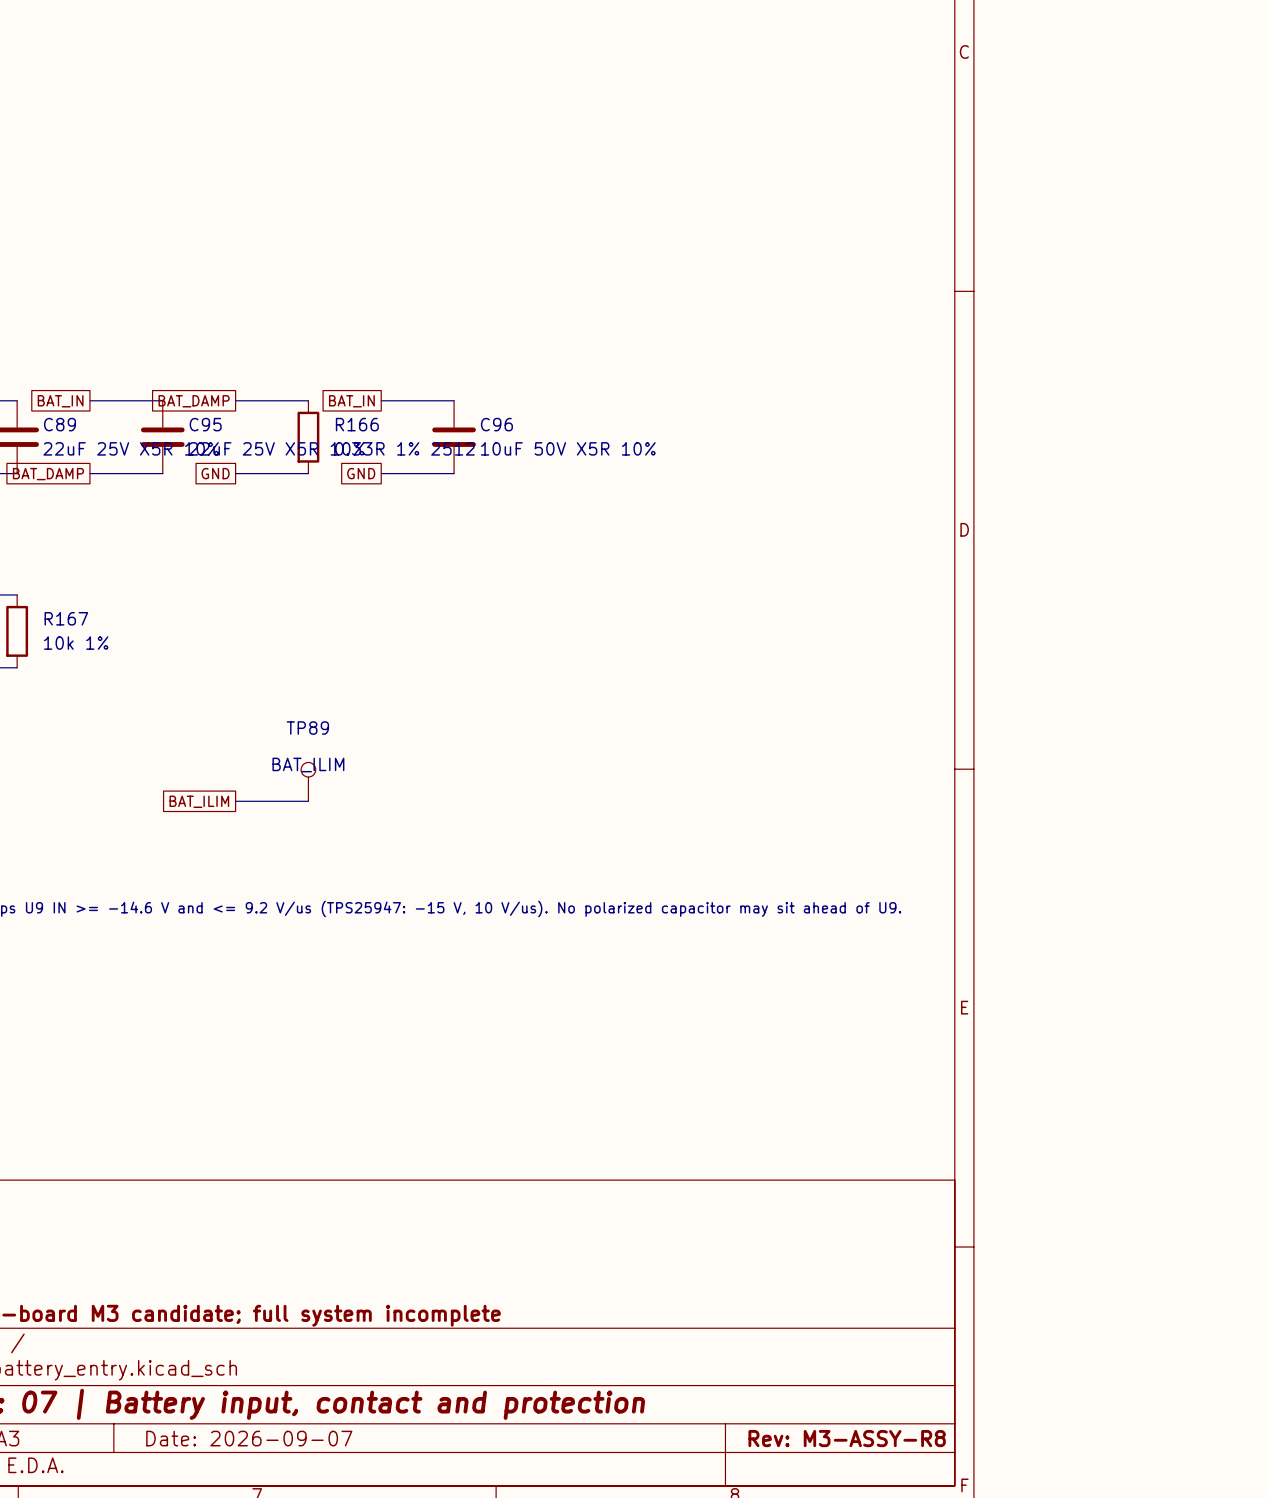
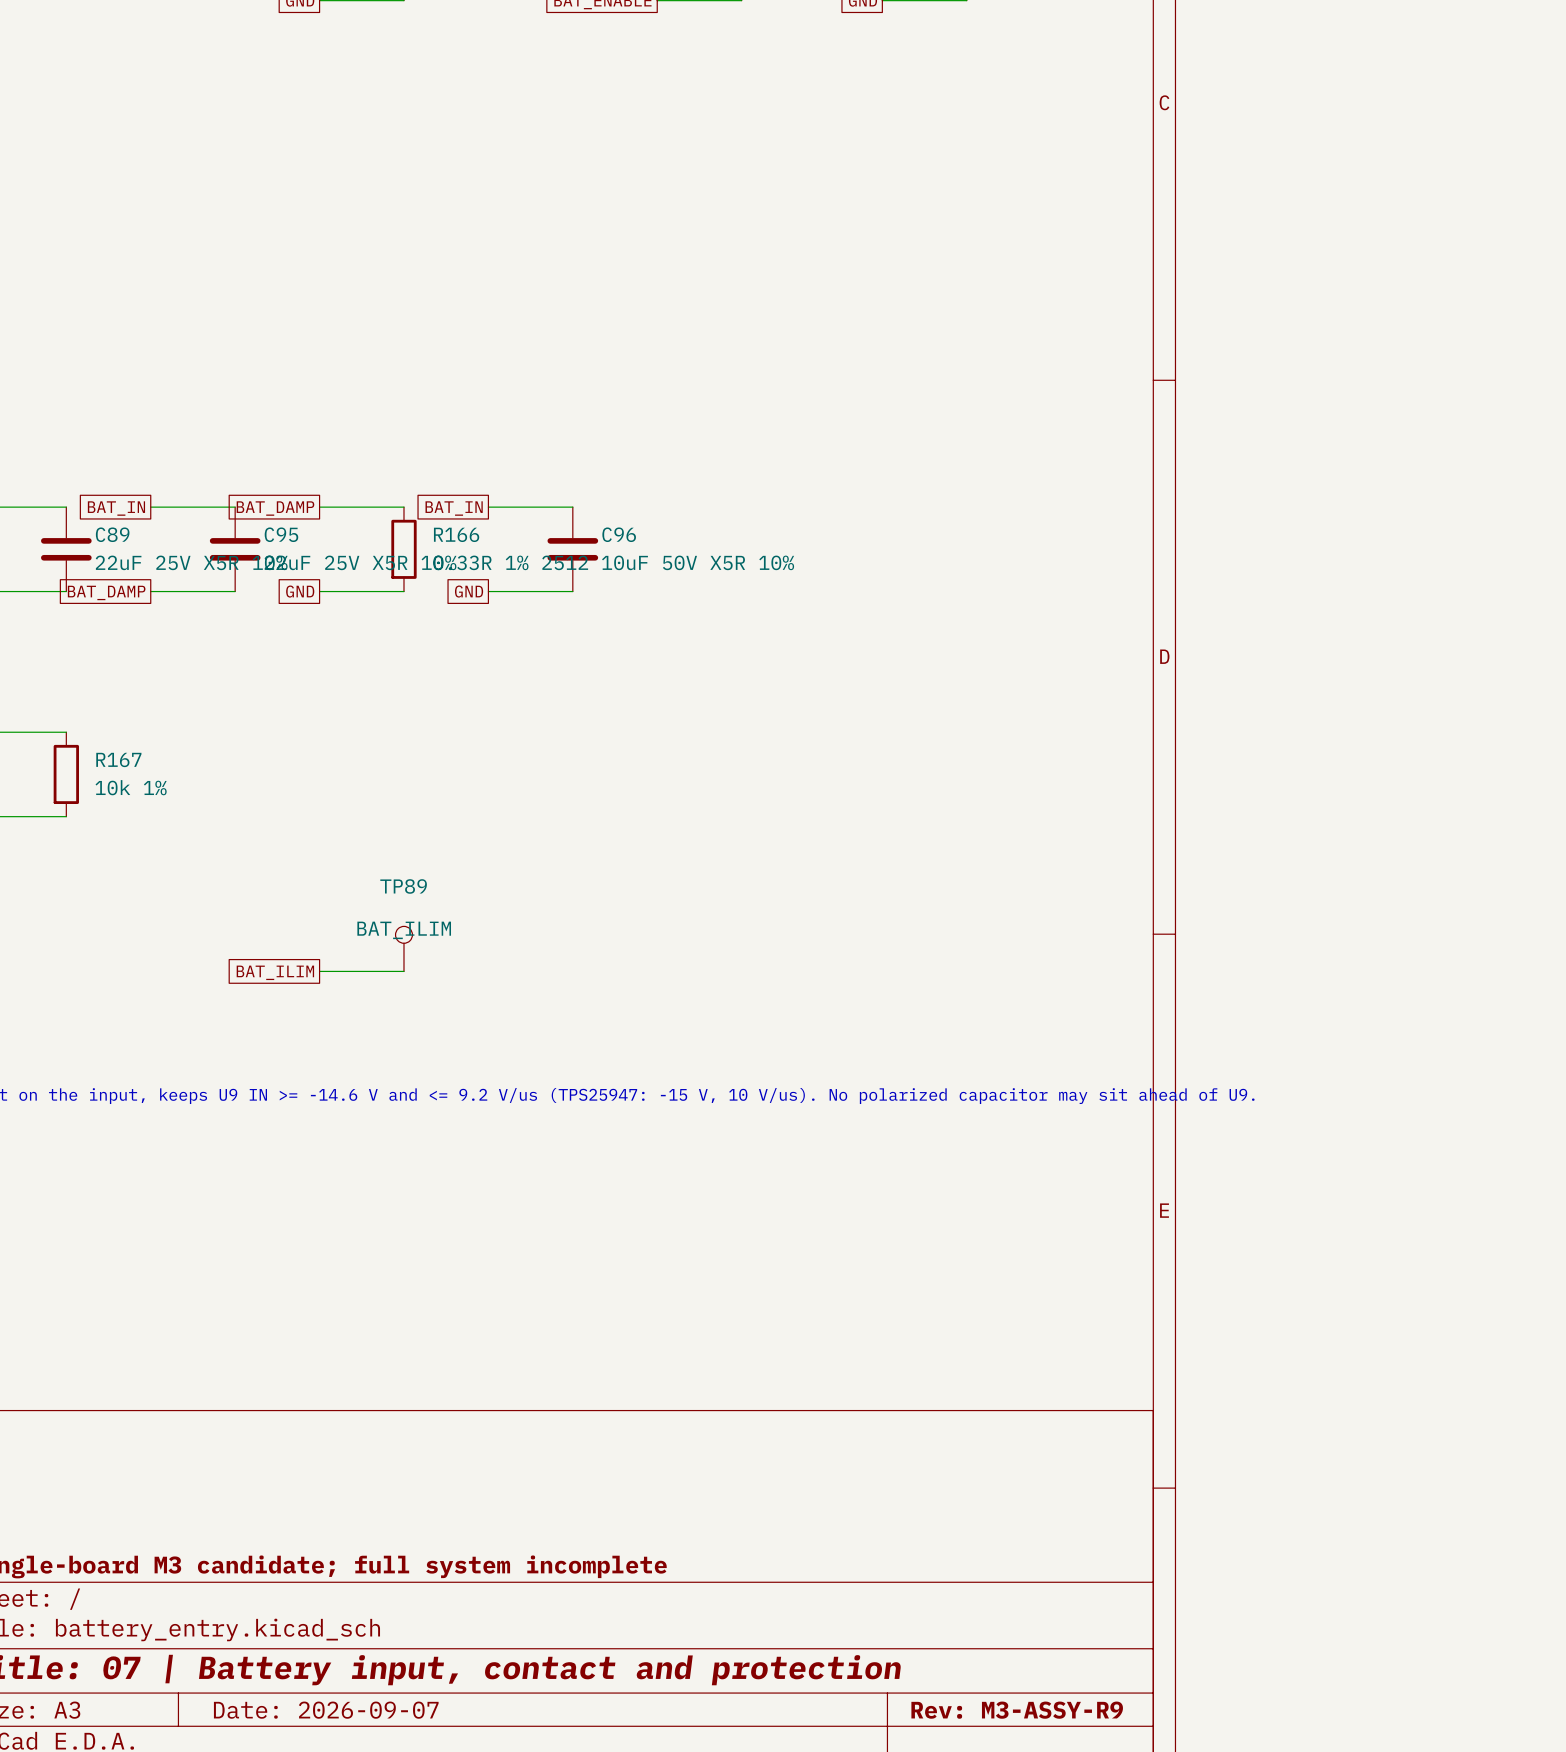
title block: Rev: M3-ASSY-R8 (847, 1438) -> Rev: M3-ASSY-R9 (1017, 1710)

